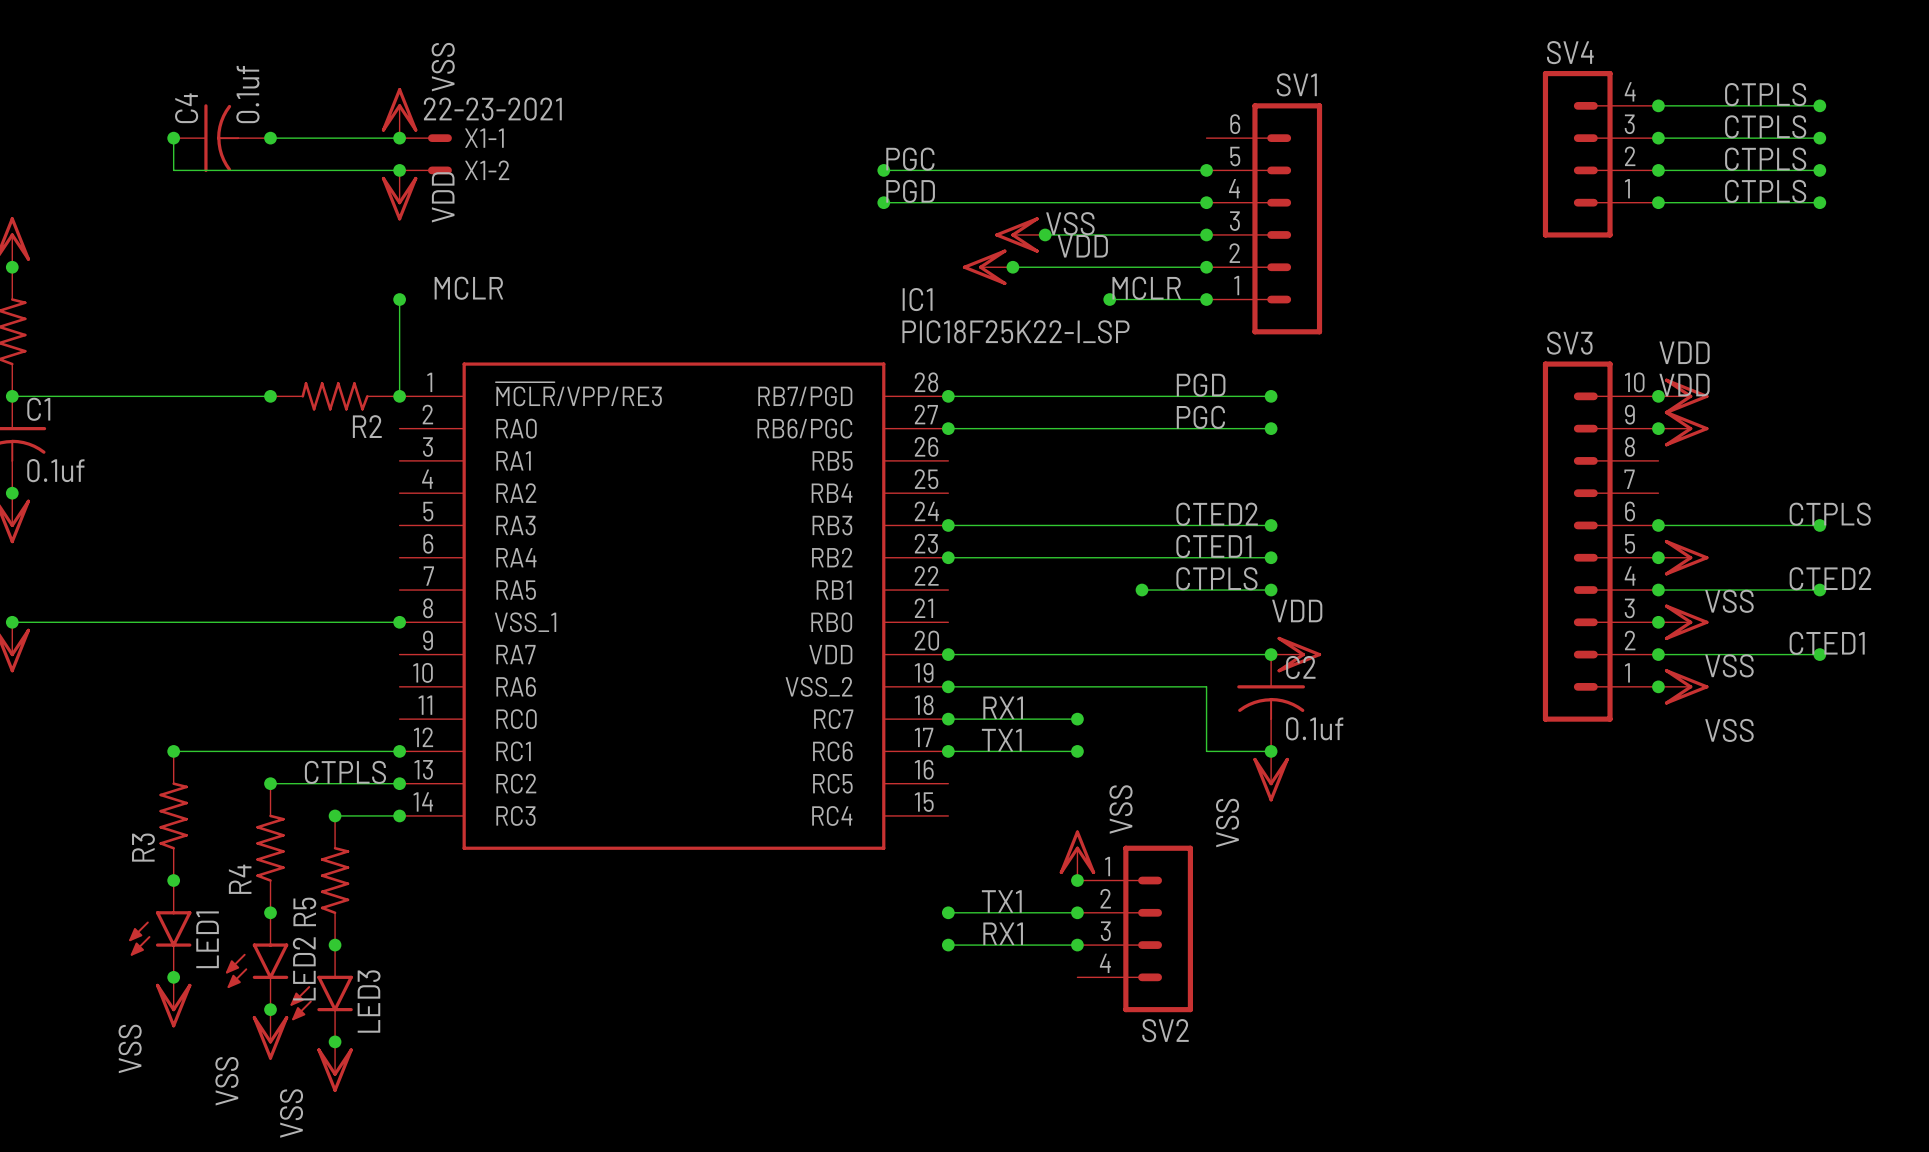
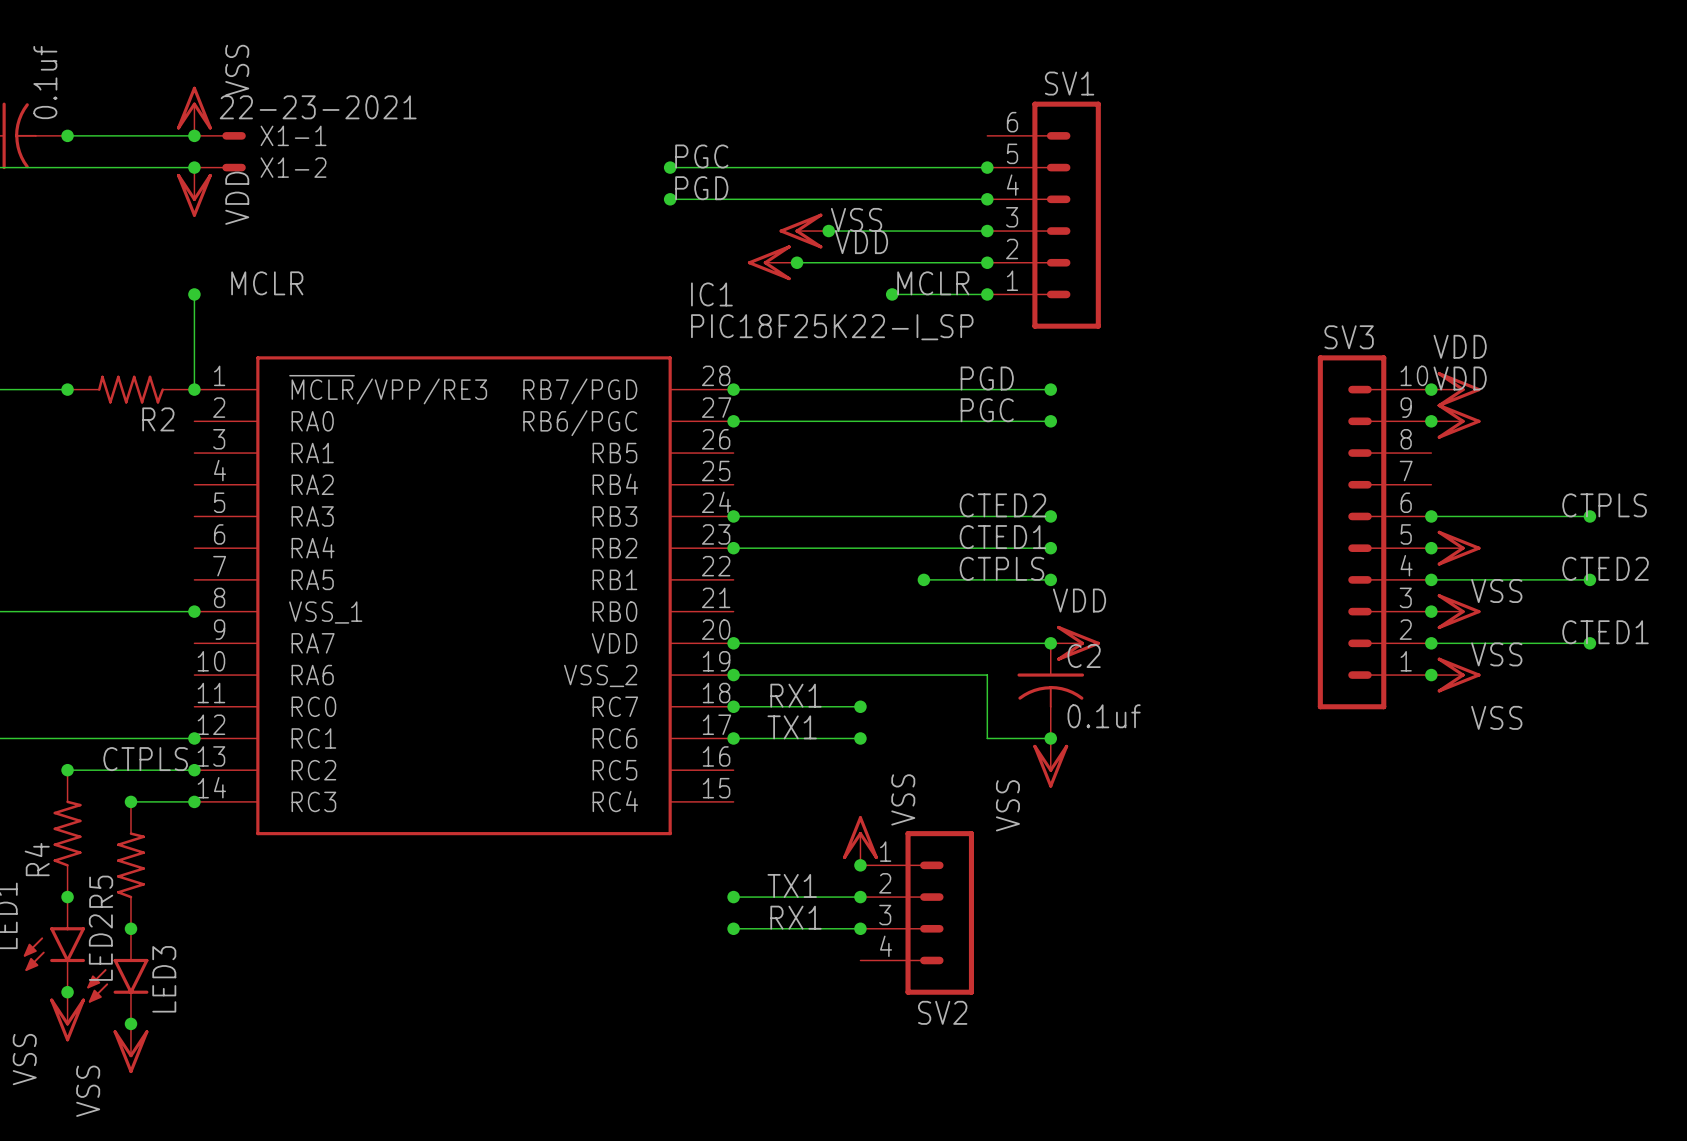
label: CTPLS (1765, 94) -> none
wire: (1658, 105) (1819, 105) -> none
junction: (1658, 105) -> none
junction: (1819, 105) -> none
label: CTPLS (1765, 126) -> none
wire: (1658, 138) (1819, 138) -> none
junction: (1658, 138) -> none
junction: (1819, 138) -> none
SV4: (1600, 154) -> none
label: CTPLS (1765, 159) -> none
wire: (1658, 170) (1819, 170) -> none
junction: (1658, 170) -> none
junction: (1819, 170) -> none
label: CTPLS (1765, 191) -> none
wire: (1658, 202) (1819, 202) -> none
junction: (1658, 202) -> none
junction: (1819, 202) -> none

